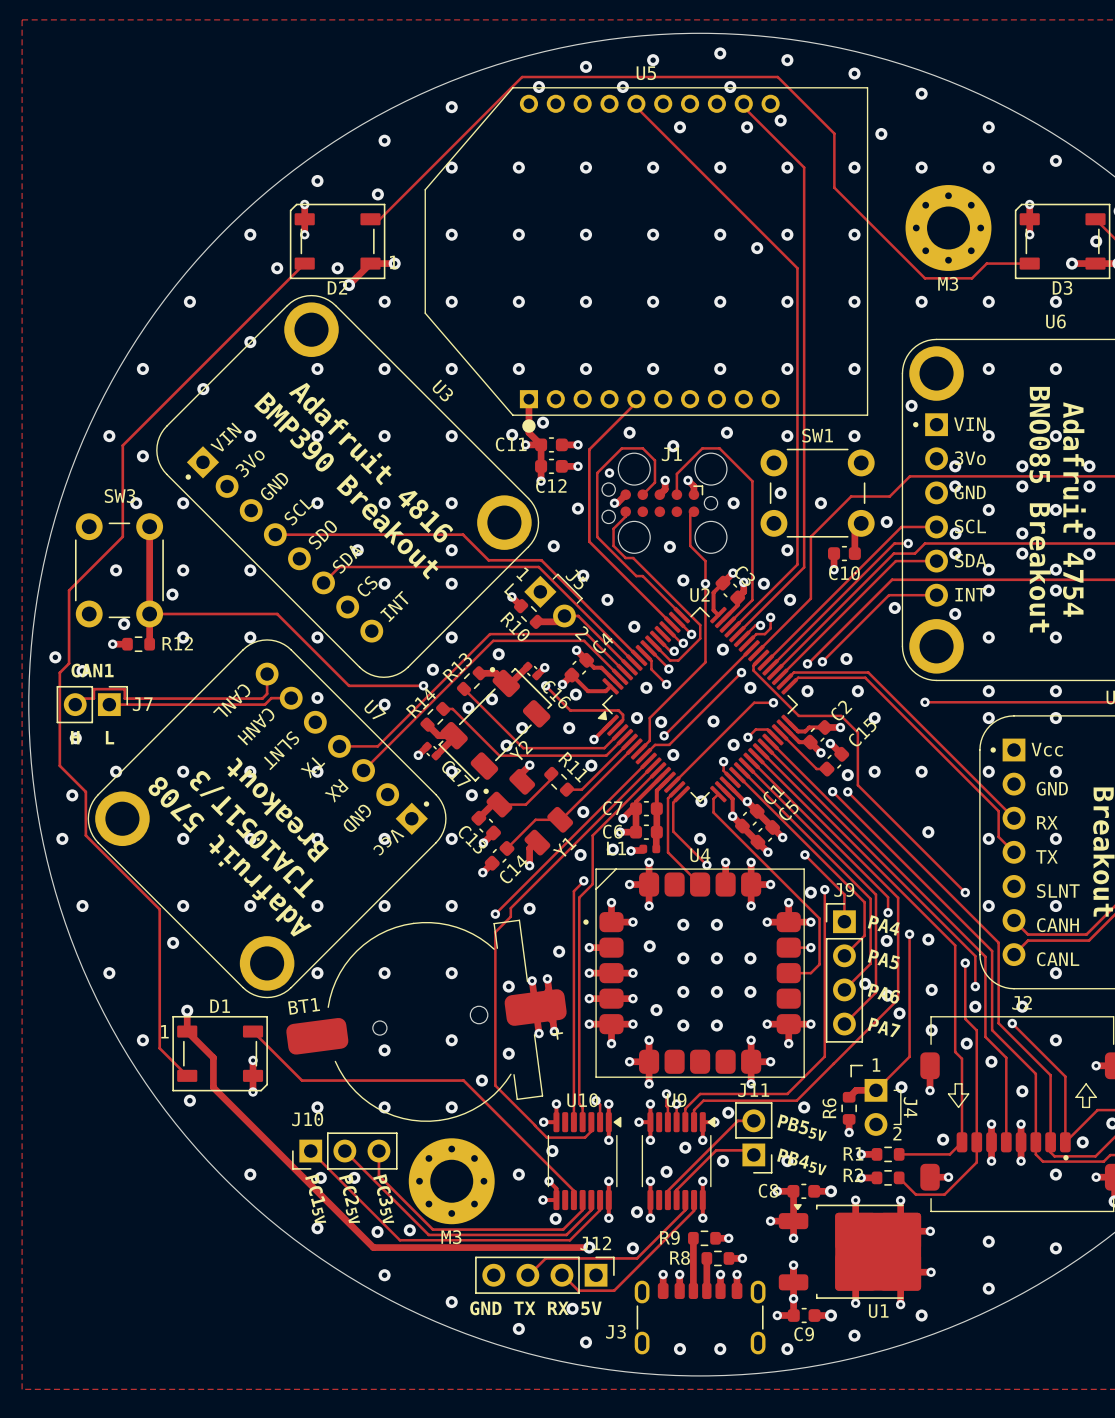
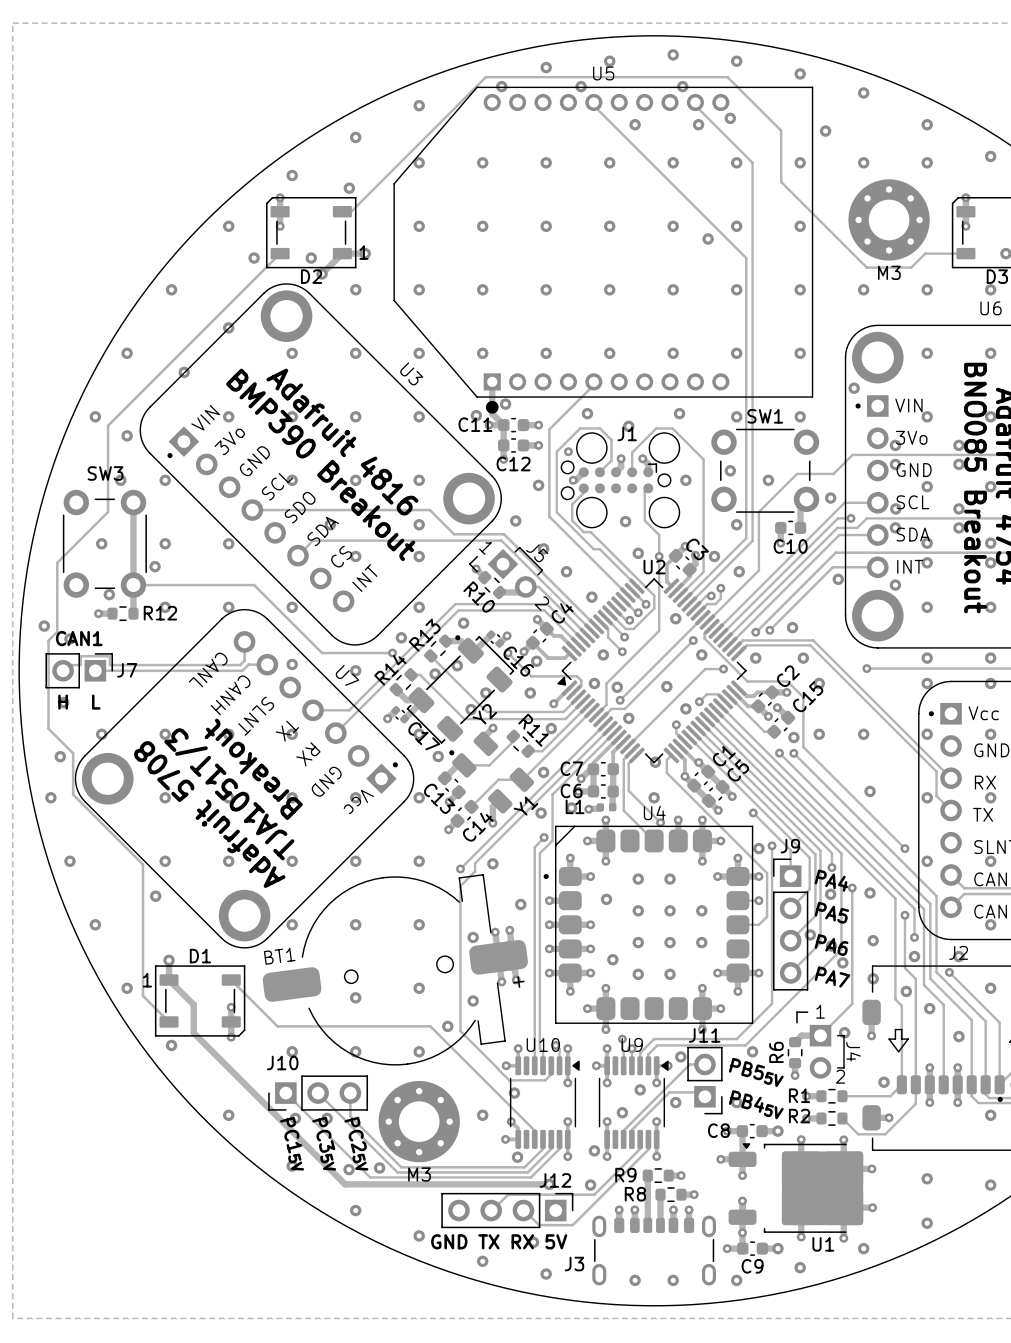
text: PC25V (349, 1198) -> PC35V (324, 1143)
text: PC35V (383, 1198) -> PC25V (356, 1143)

